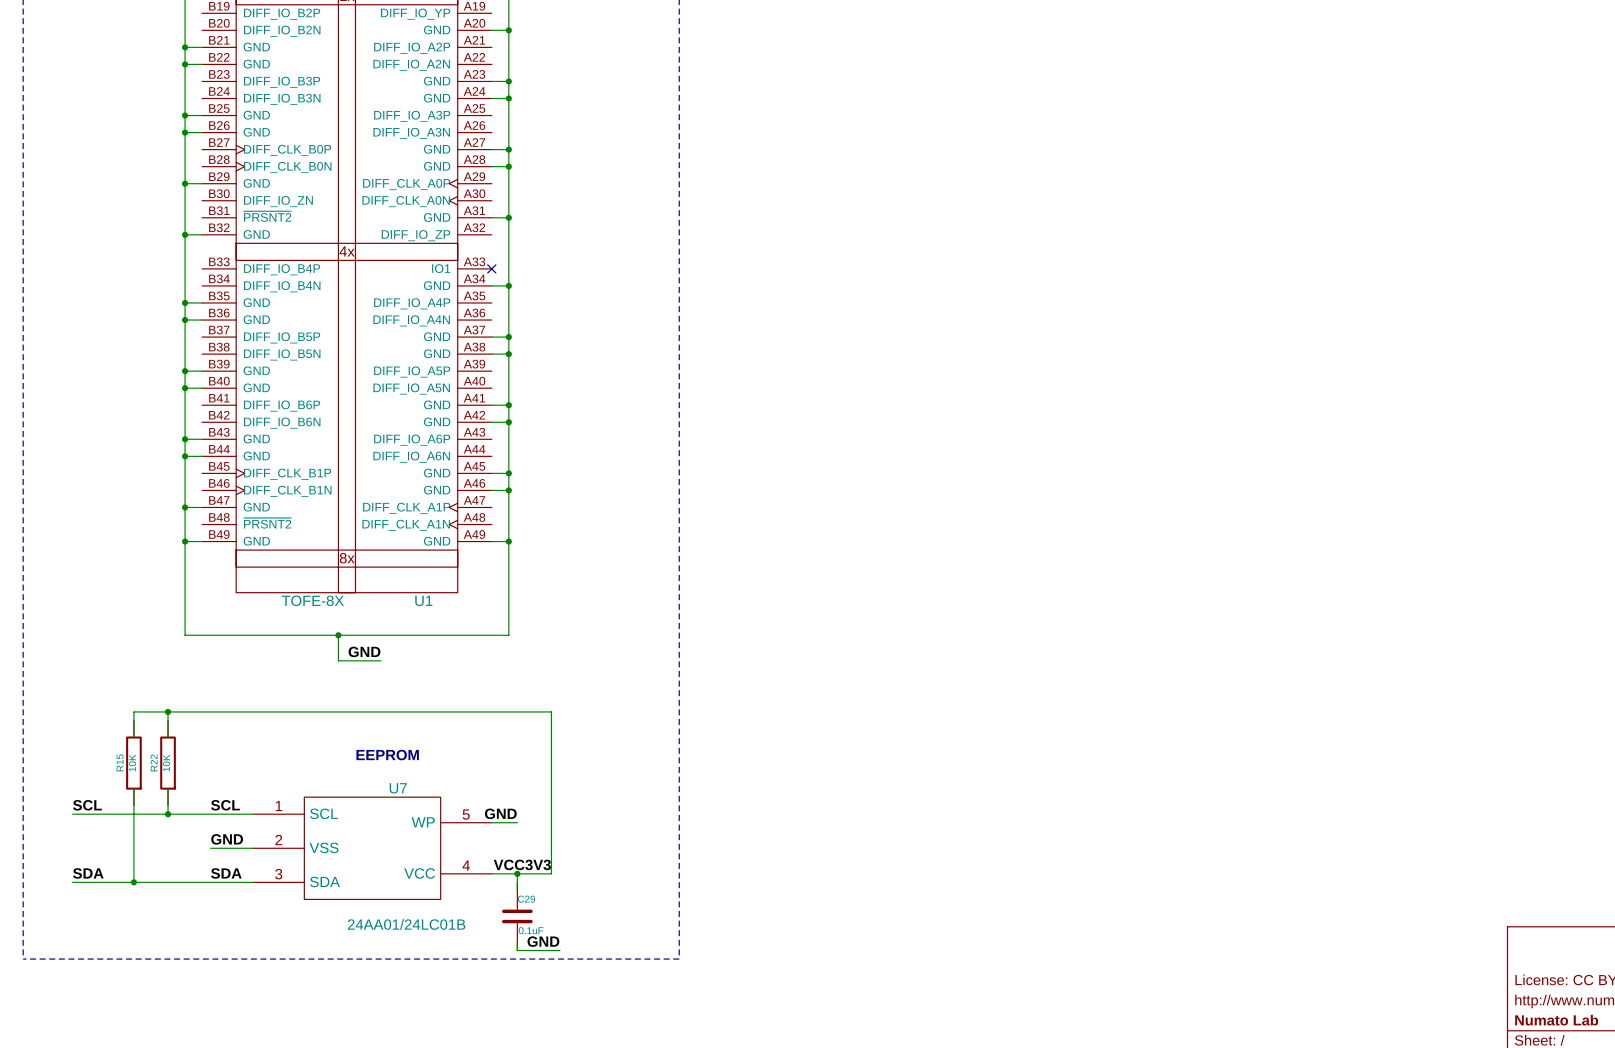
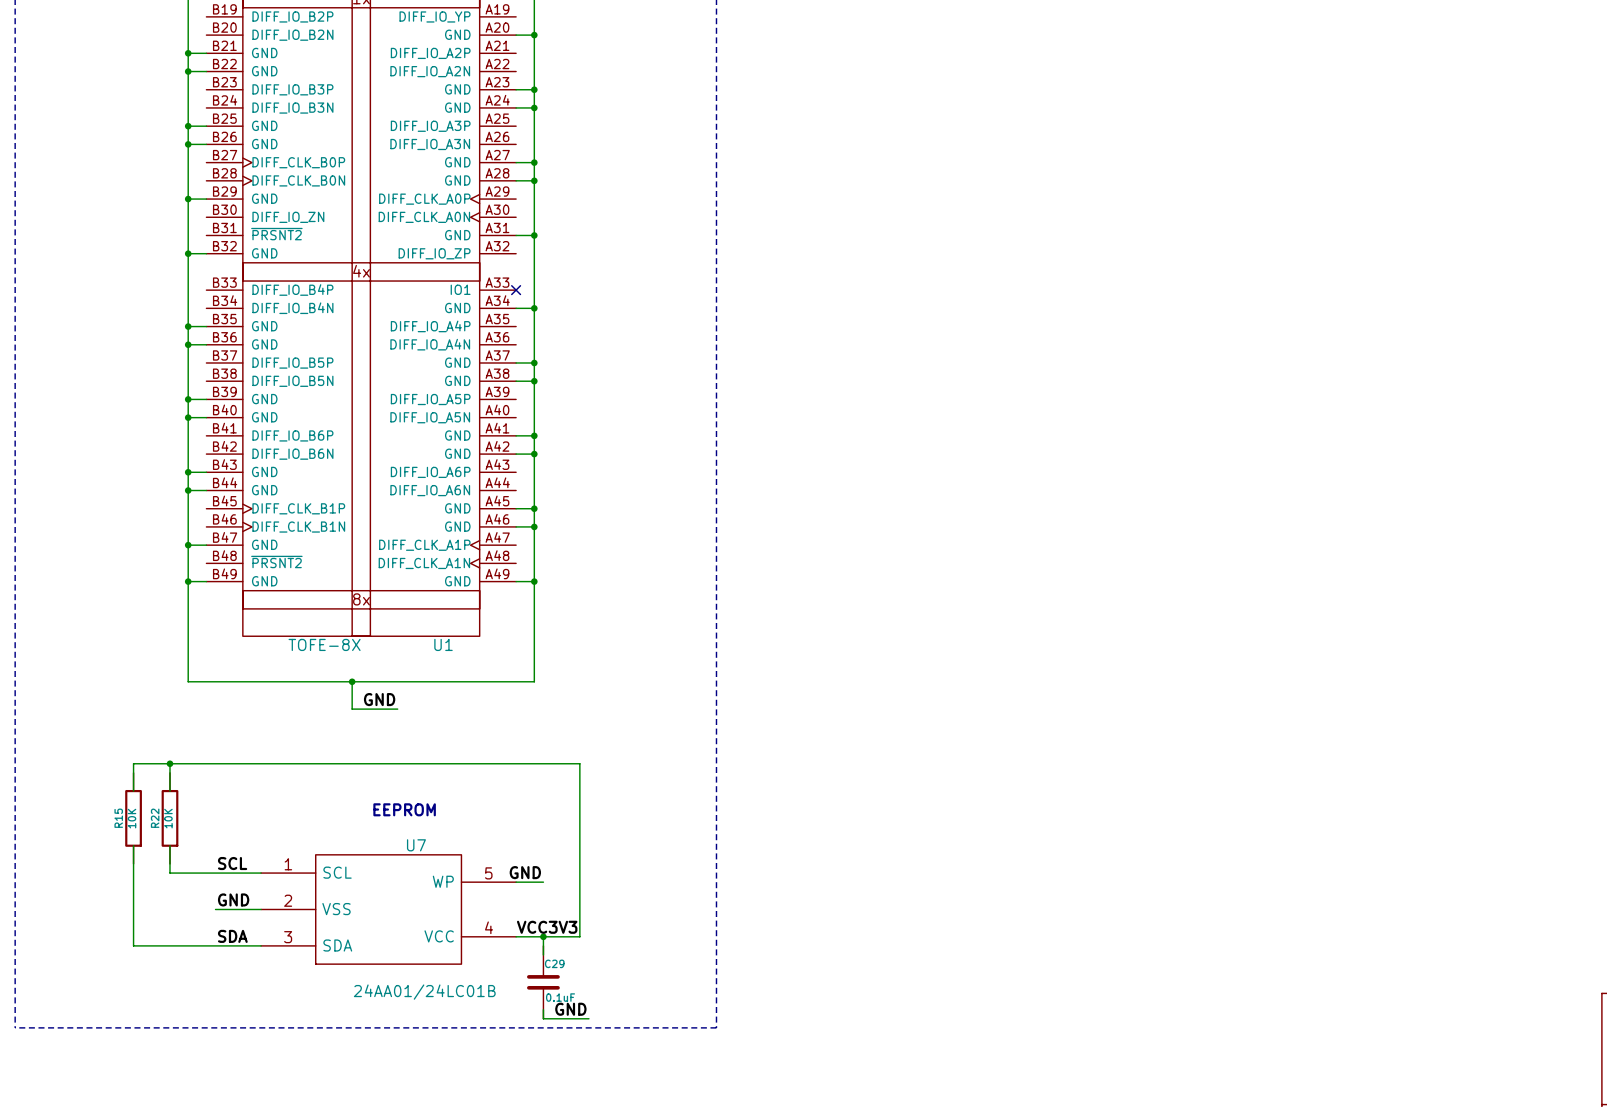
label: SCL (87, 805) -> none
wire: (72, 814) (168, 814) -> none
junction: (168, 814) -> none
label: SDA (88, 873) -> none
wire: (72, 882) (133, 882) -> none
junction: (133, 882) -> none

